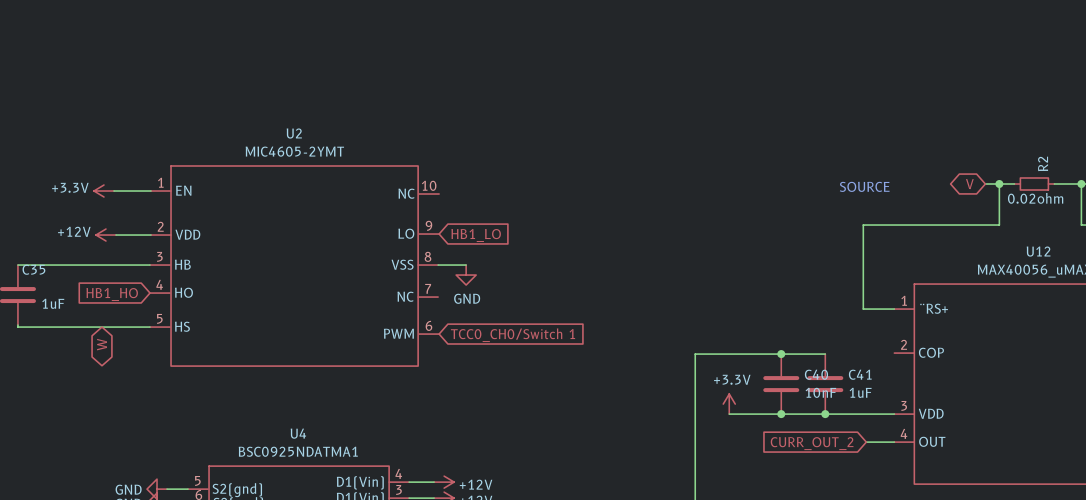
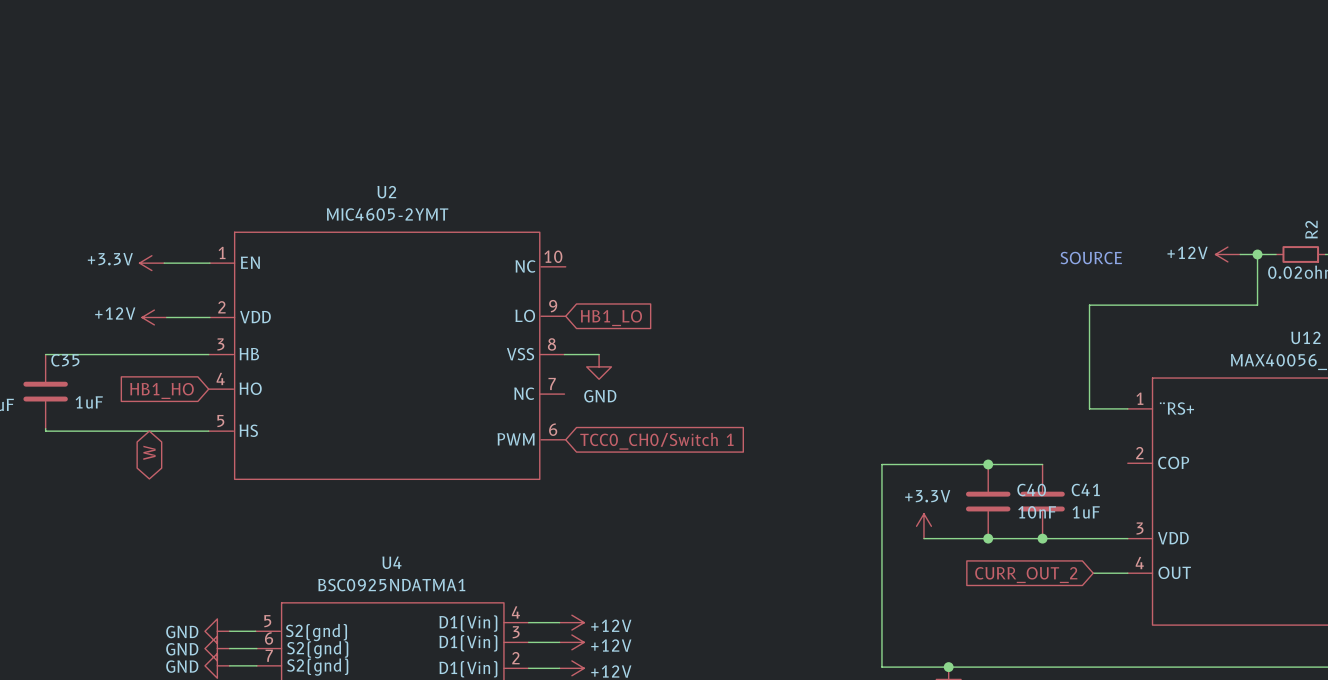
global label: V (969, 184) -> none
power symbol: none -> +12V (1227, 254)

